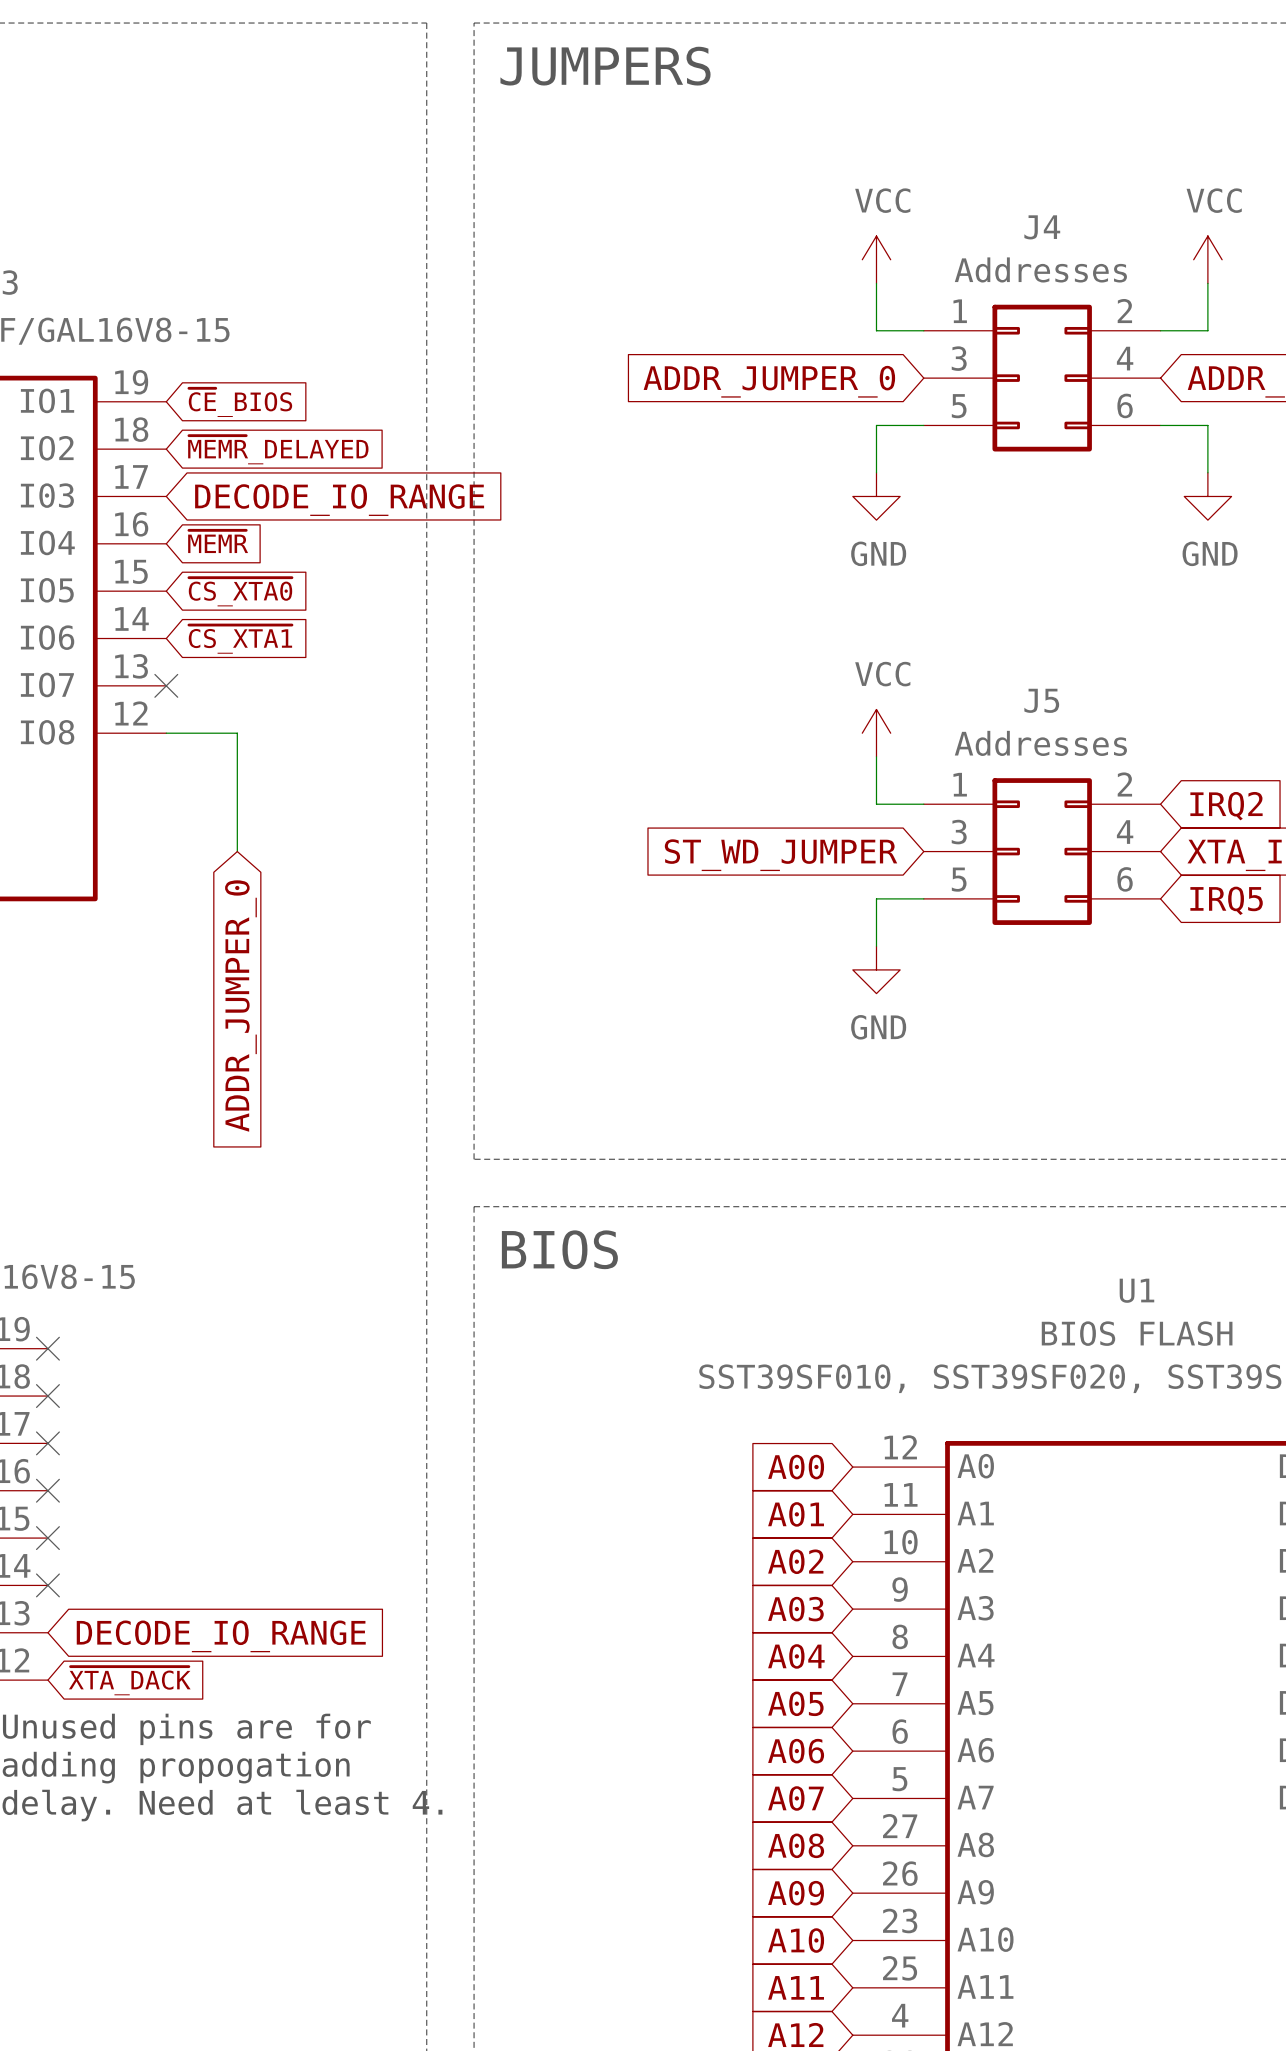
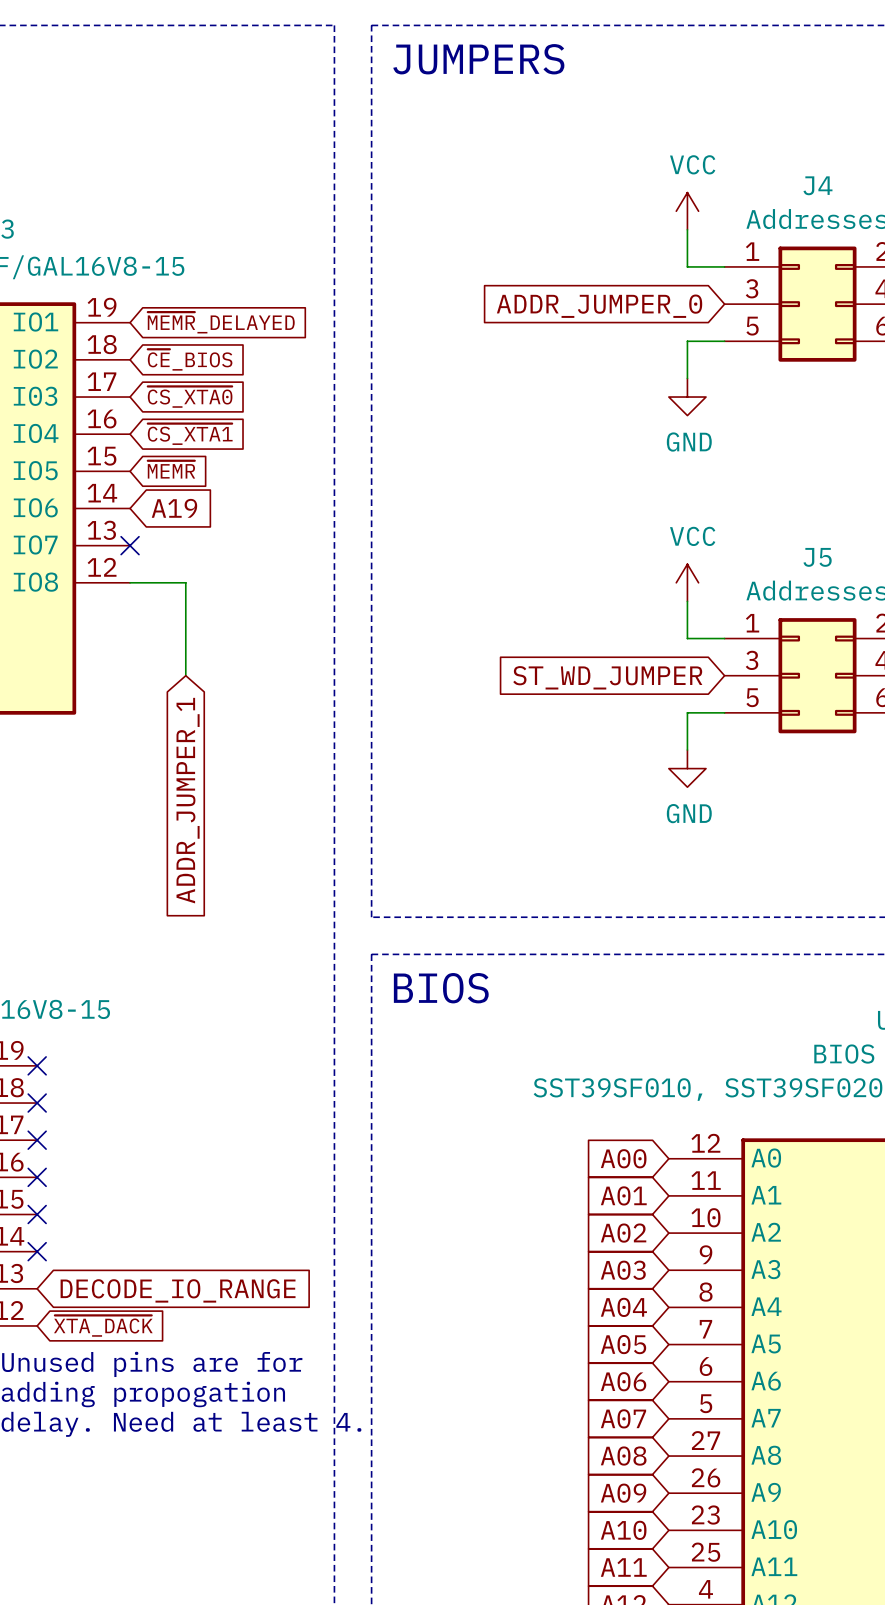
global label: ~{CE}_BIOS (240, 402) -> ~{MEMR}_DELAYED (221, 322)
global label: ~{MEMR}_DELAYED (278, 449) -> ~{CE}_BIOS (190, 359)
global label: DECODE_IO_RANGE (339, 500) -> ~{CS_XTA0} (190, 397)
global label: ~{MEMR} (218, 541) -> ~{CS_XTA1} (190, 434)
global label: ~{CS_XTA0} (240, 592) -> ~{MEMR} (171, 469)
global label: ~{CS_XTA1} (240, 639) -> A19 (174, 508)
global label: ADDR_JUMPER_0 (240, 1006) -> ADDR_JUMPER_1 (188, 800)

